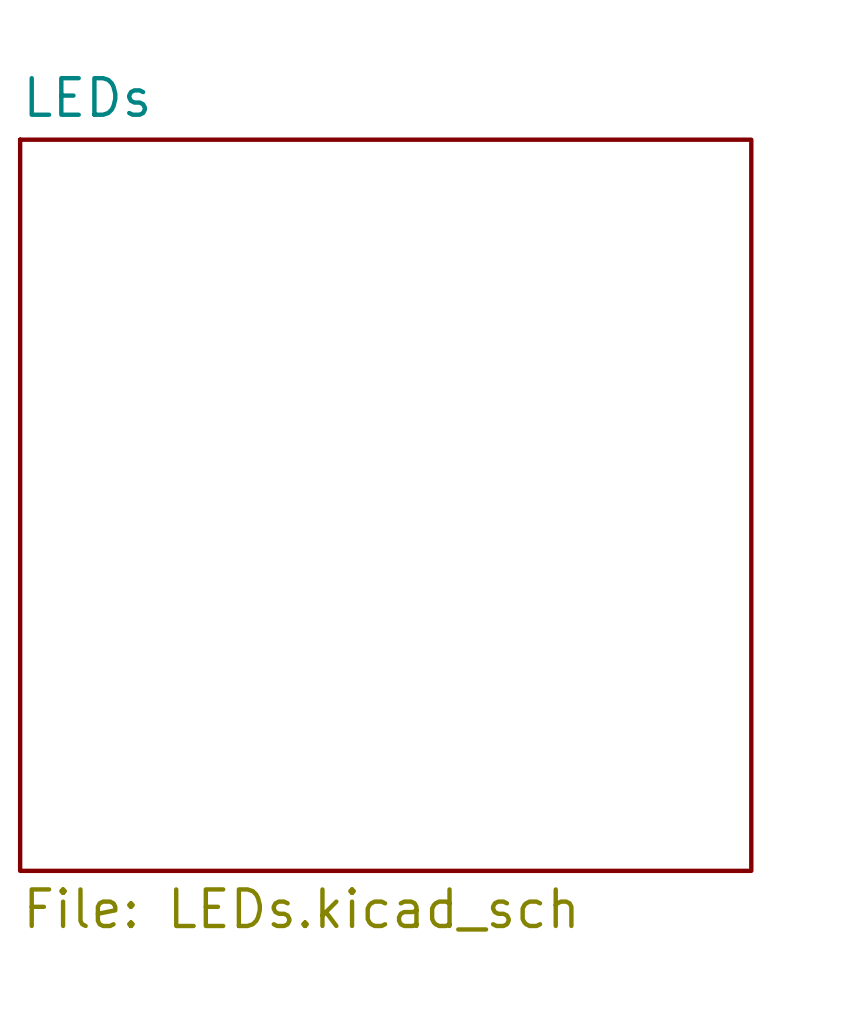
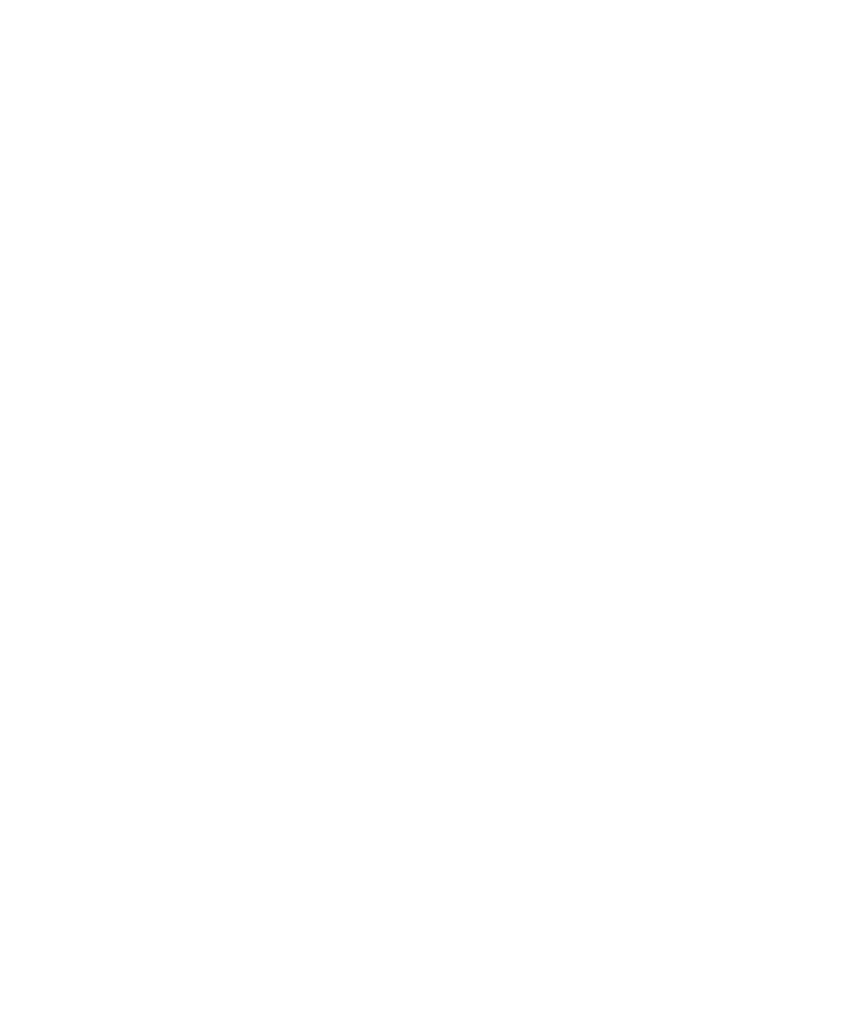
sheet LEDs: File: LEDs.kicad_sch (385, 505) -> none

